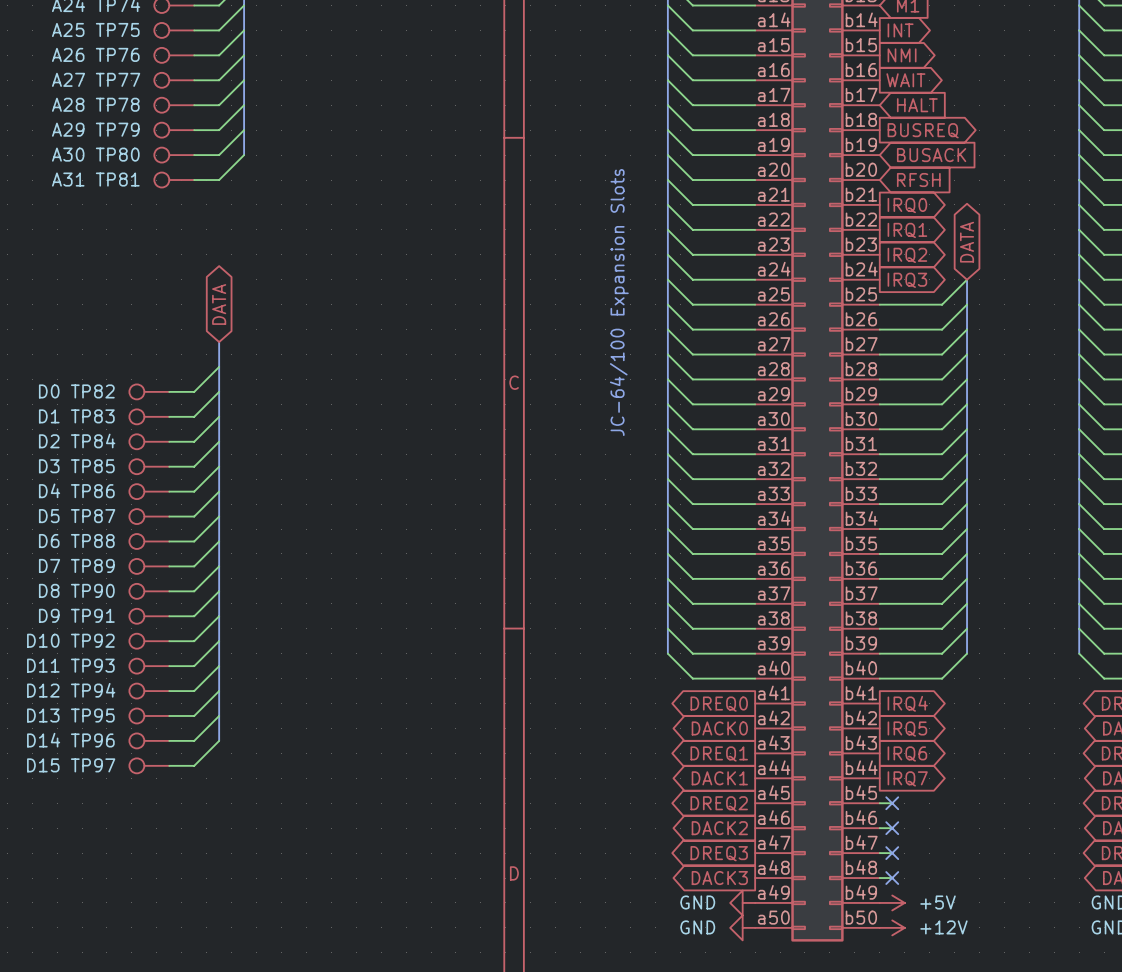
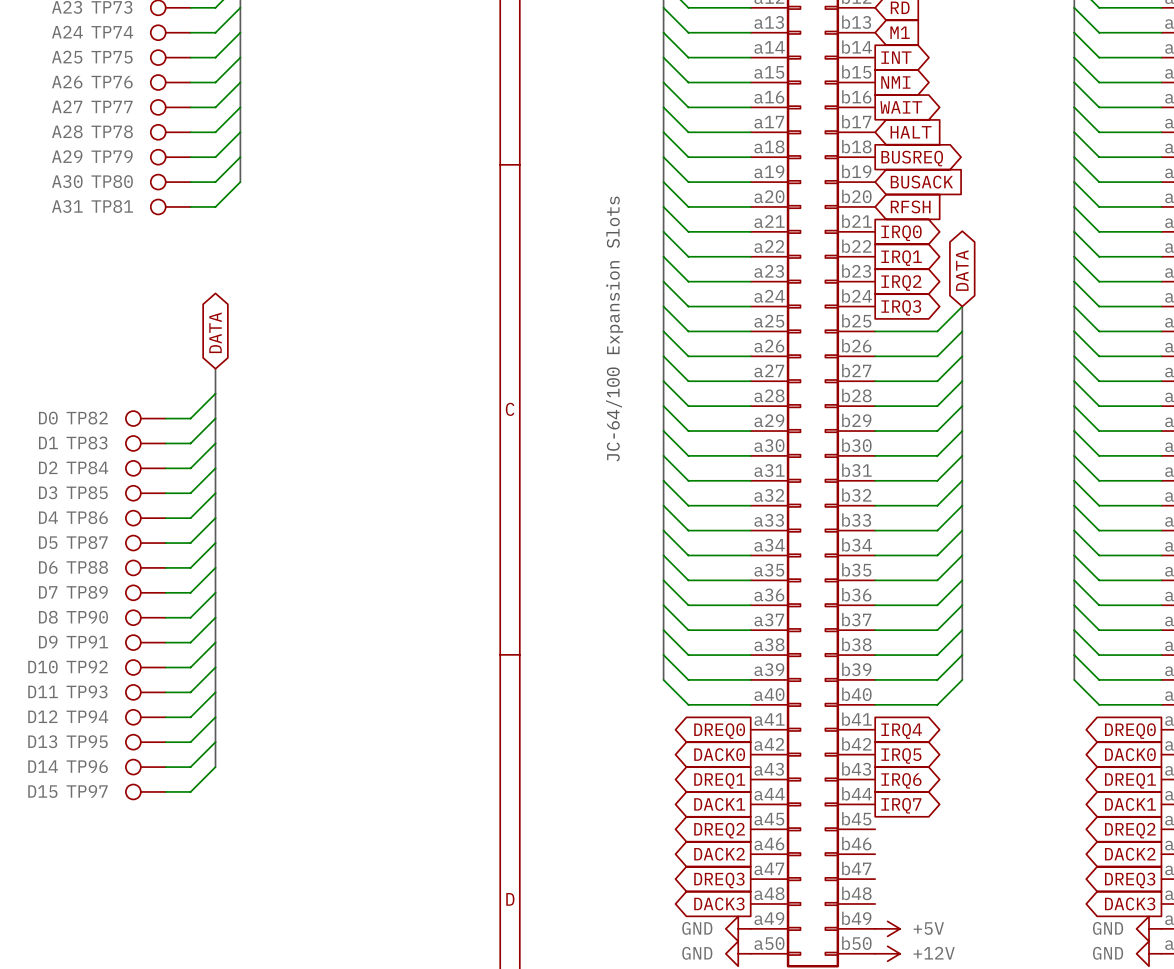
wire: (879, 803) (892, 803) -> none
no-connect mark: (892, 803) -> none
wire: (879, 828) (892, 828) -> none
no-connect mark: (892, 828) -> none
wire: (879, 853) (892, 853) -> none
no-connect mark: (892, 853) -> none
wire: (879, 878) (892, 878) -> none
no-connect mark: (892, 878) -> none

